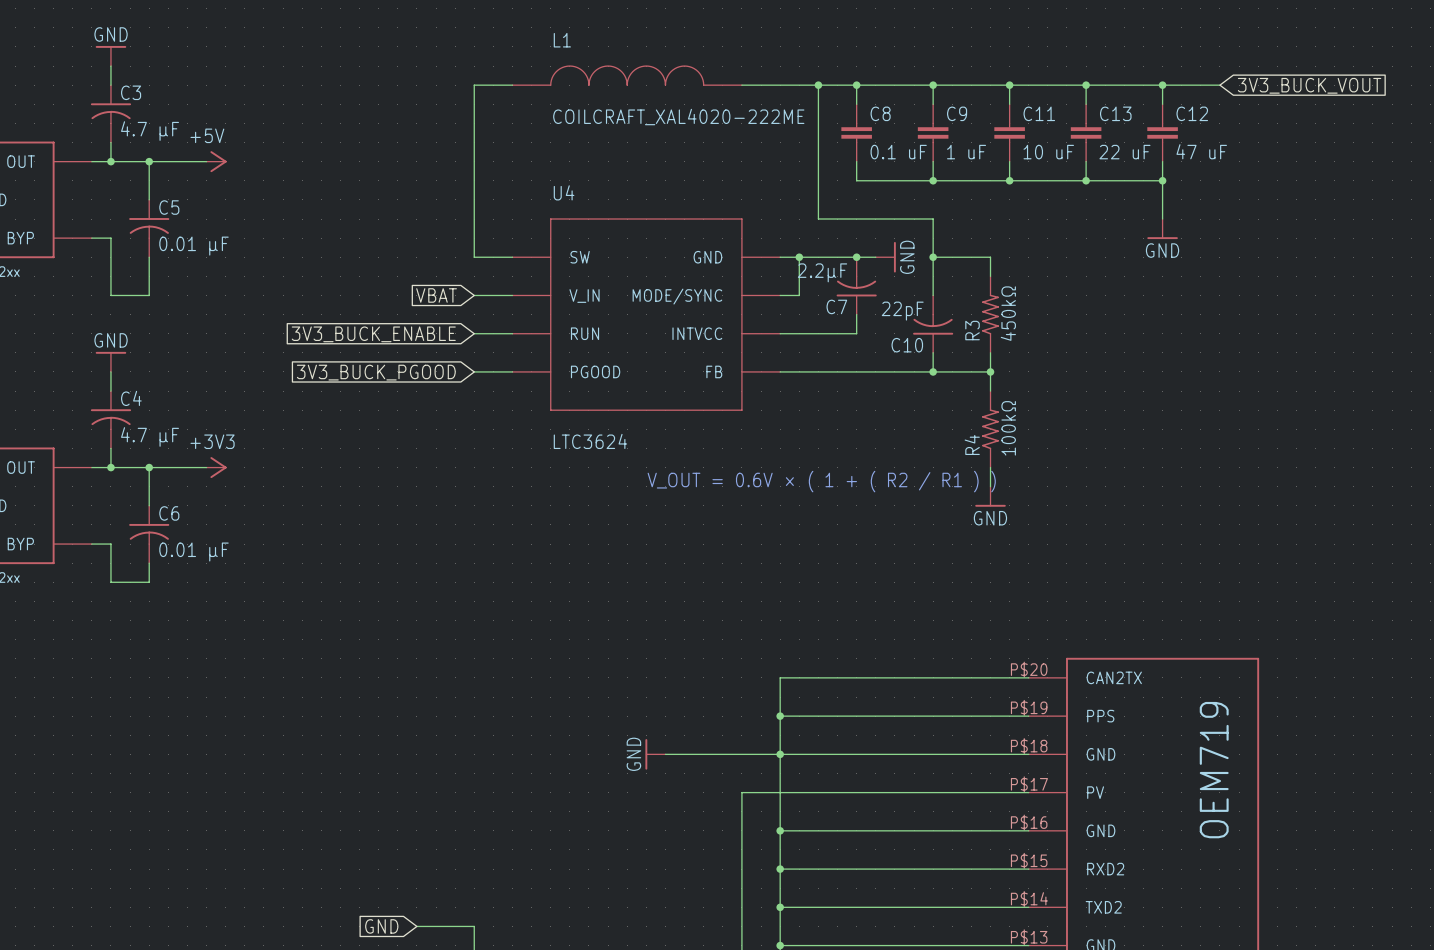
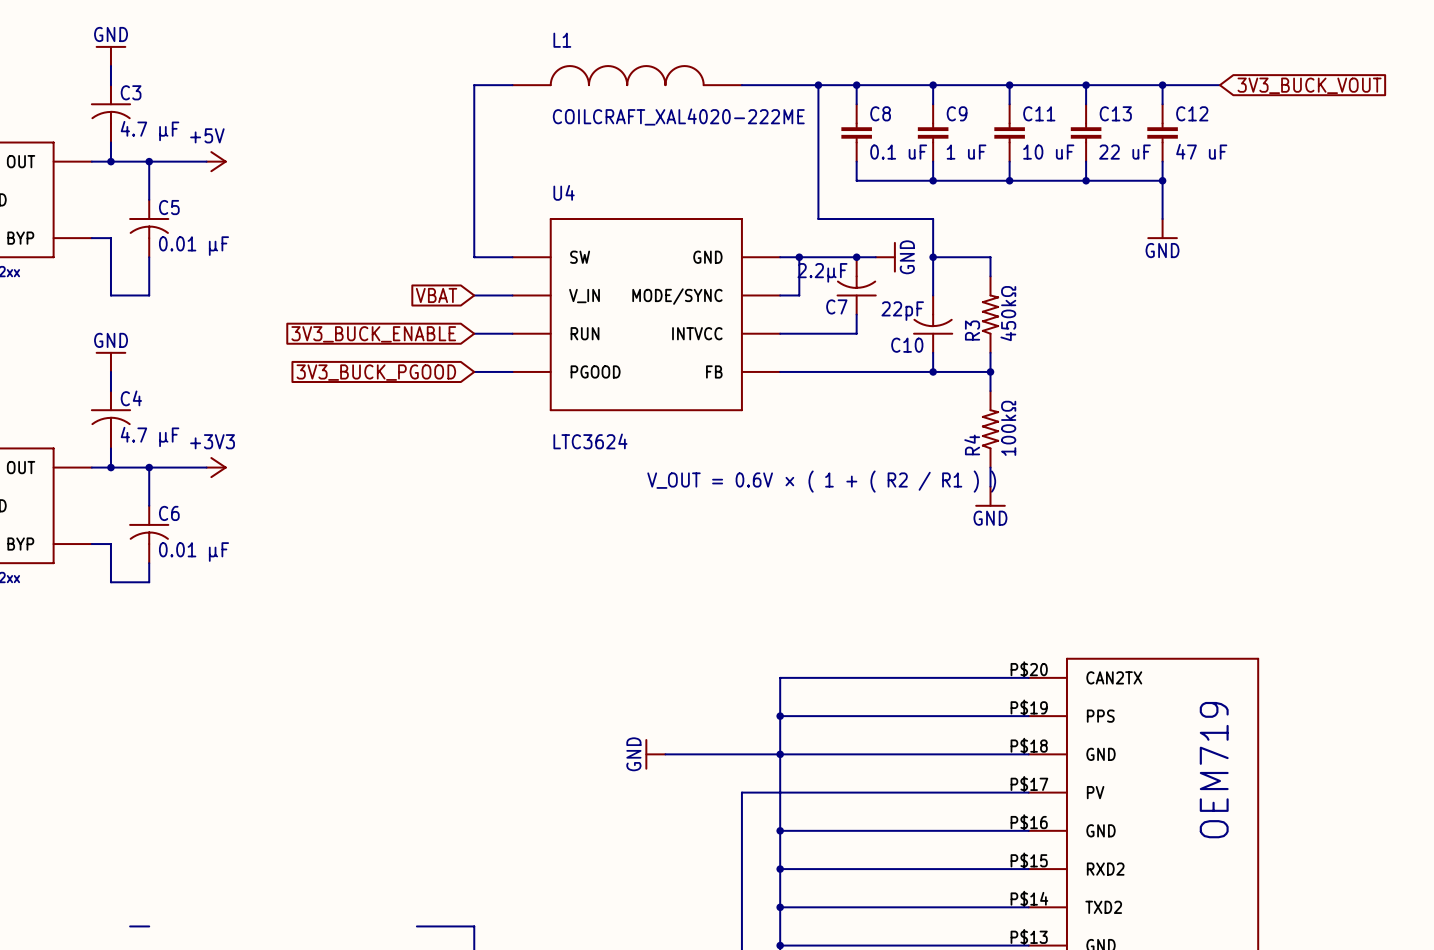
wire: none -> (130, 926) (149, 926)
global label: GND (381, 926) -> none

